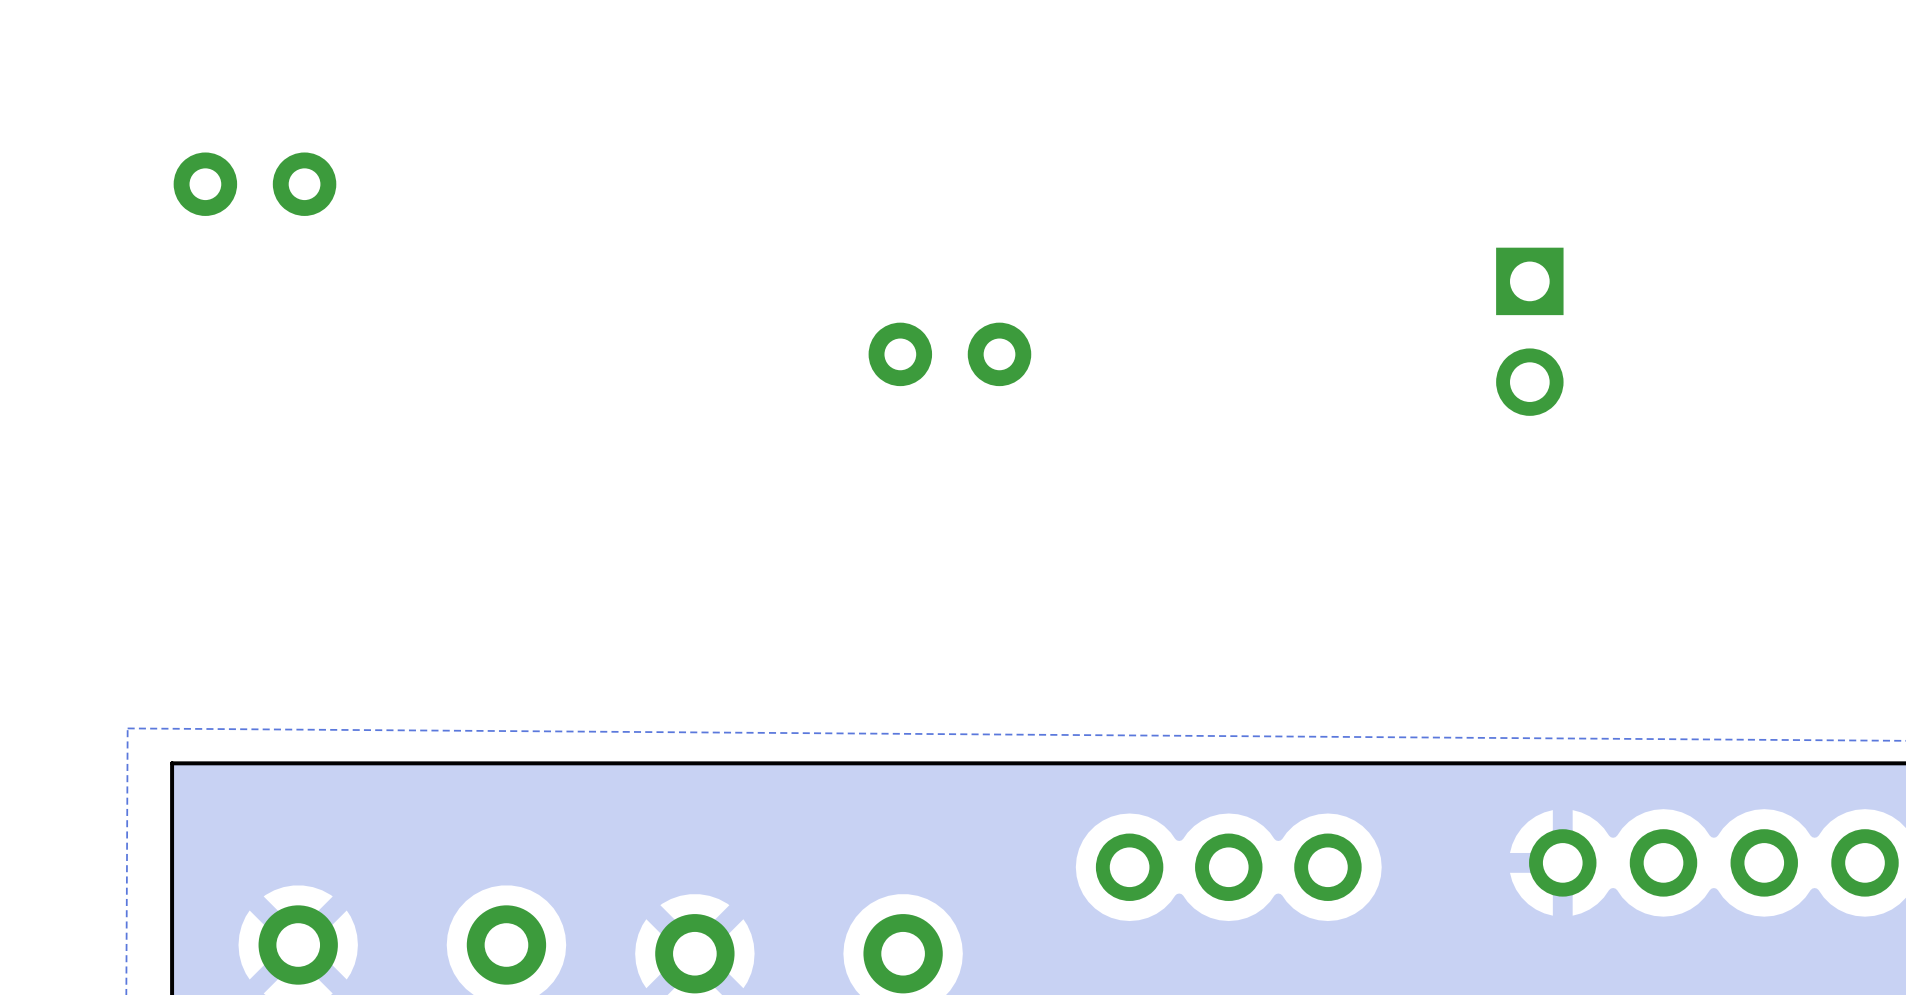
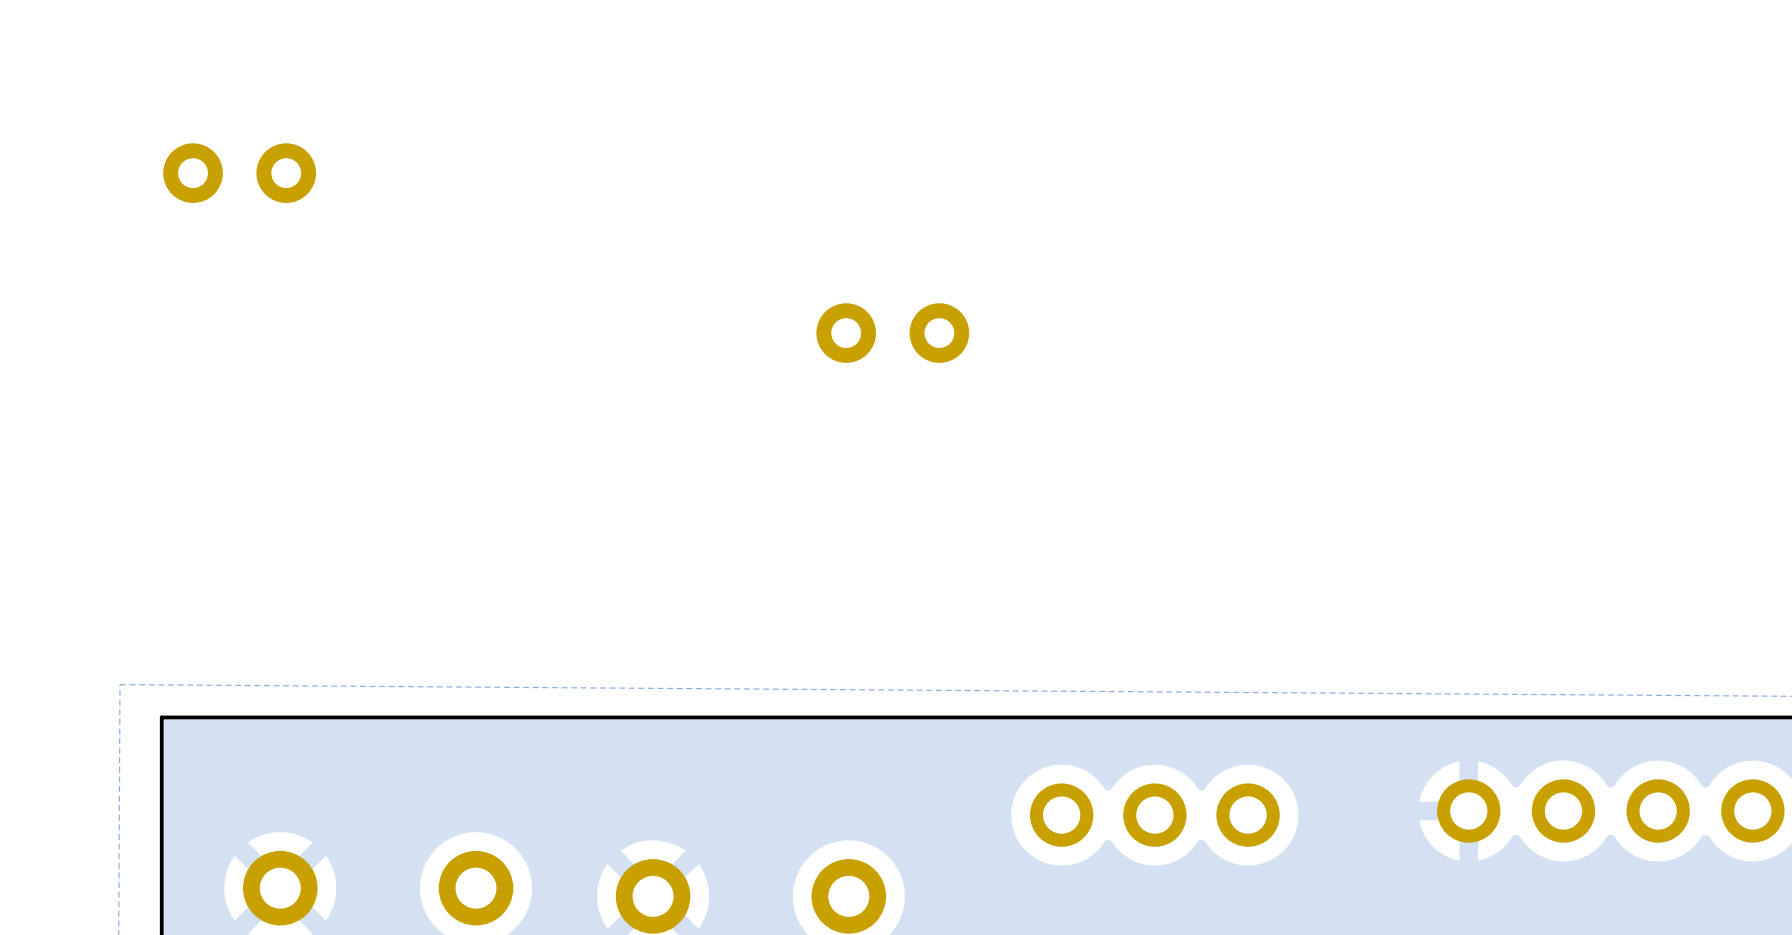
part: (1529, 331) -> none

